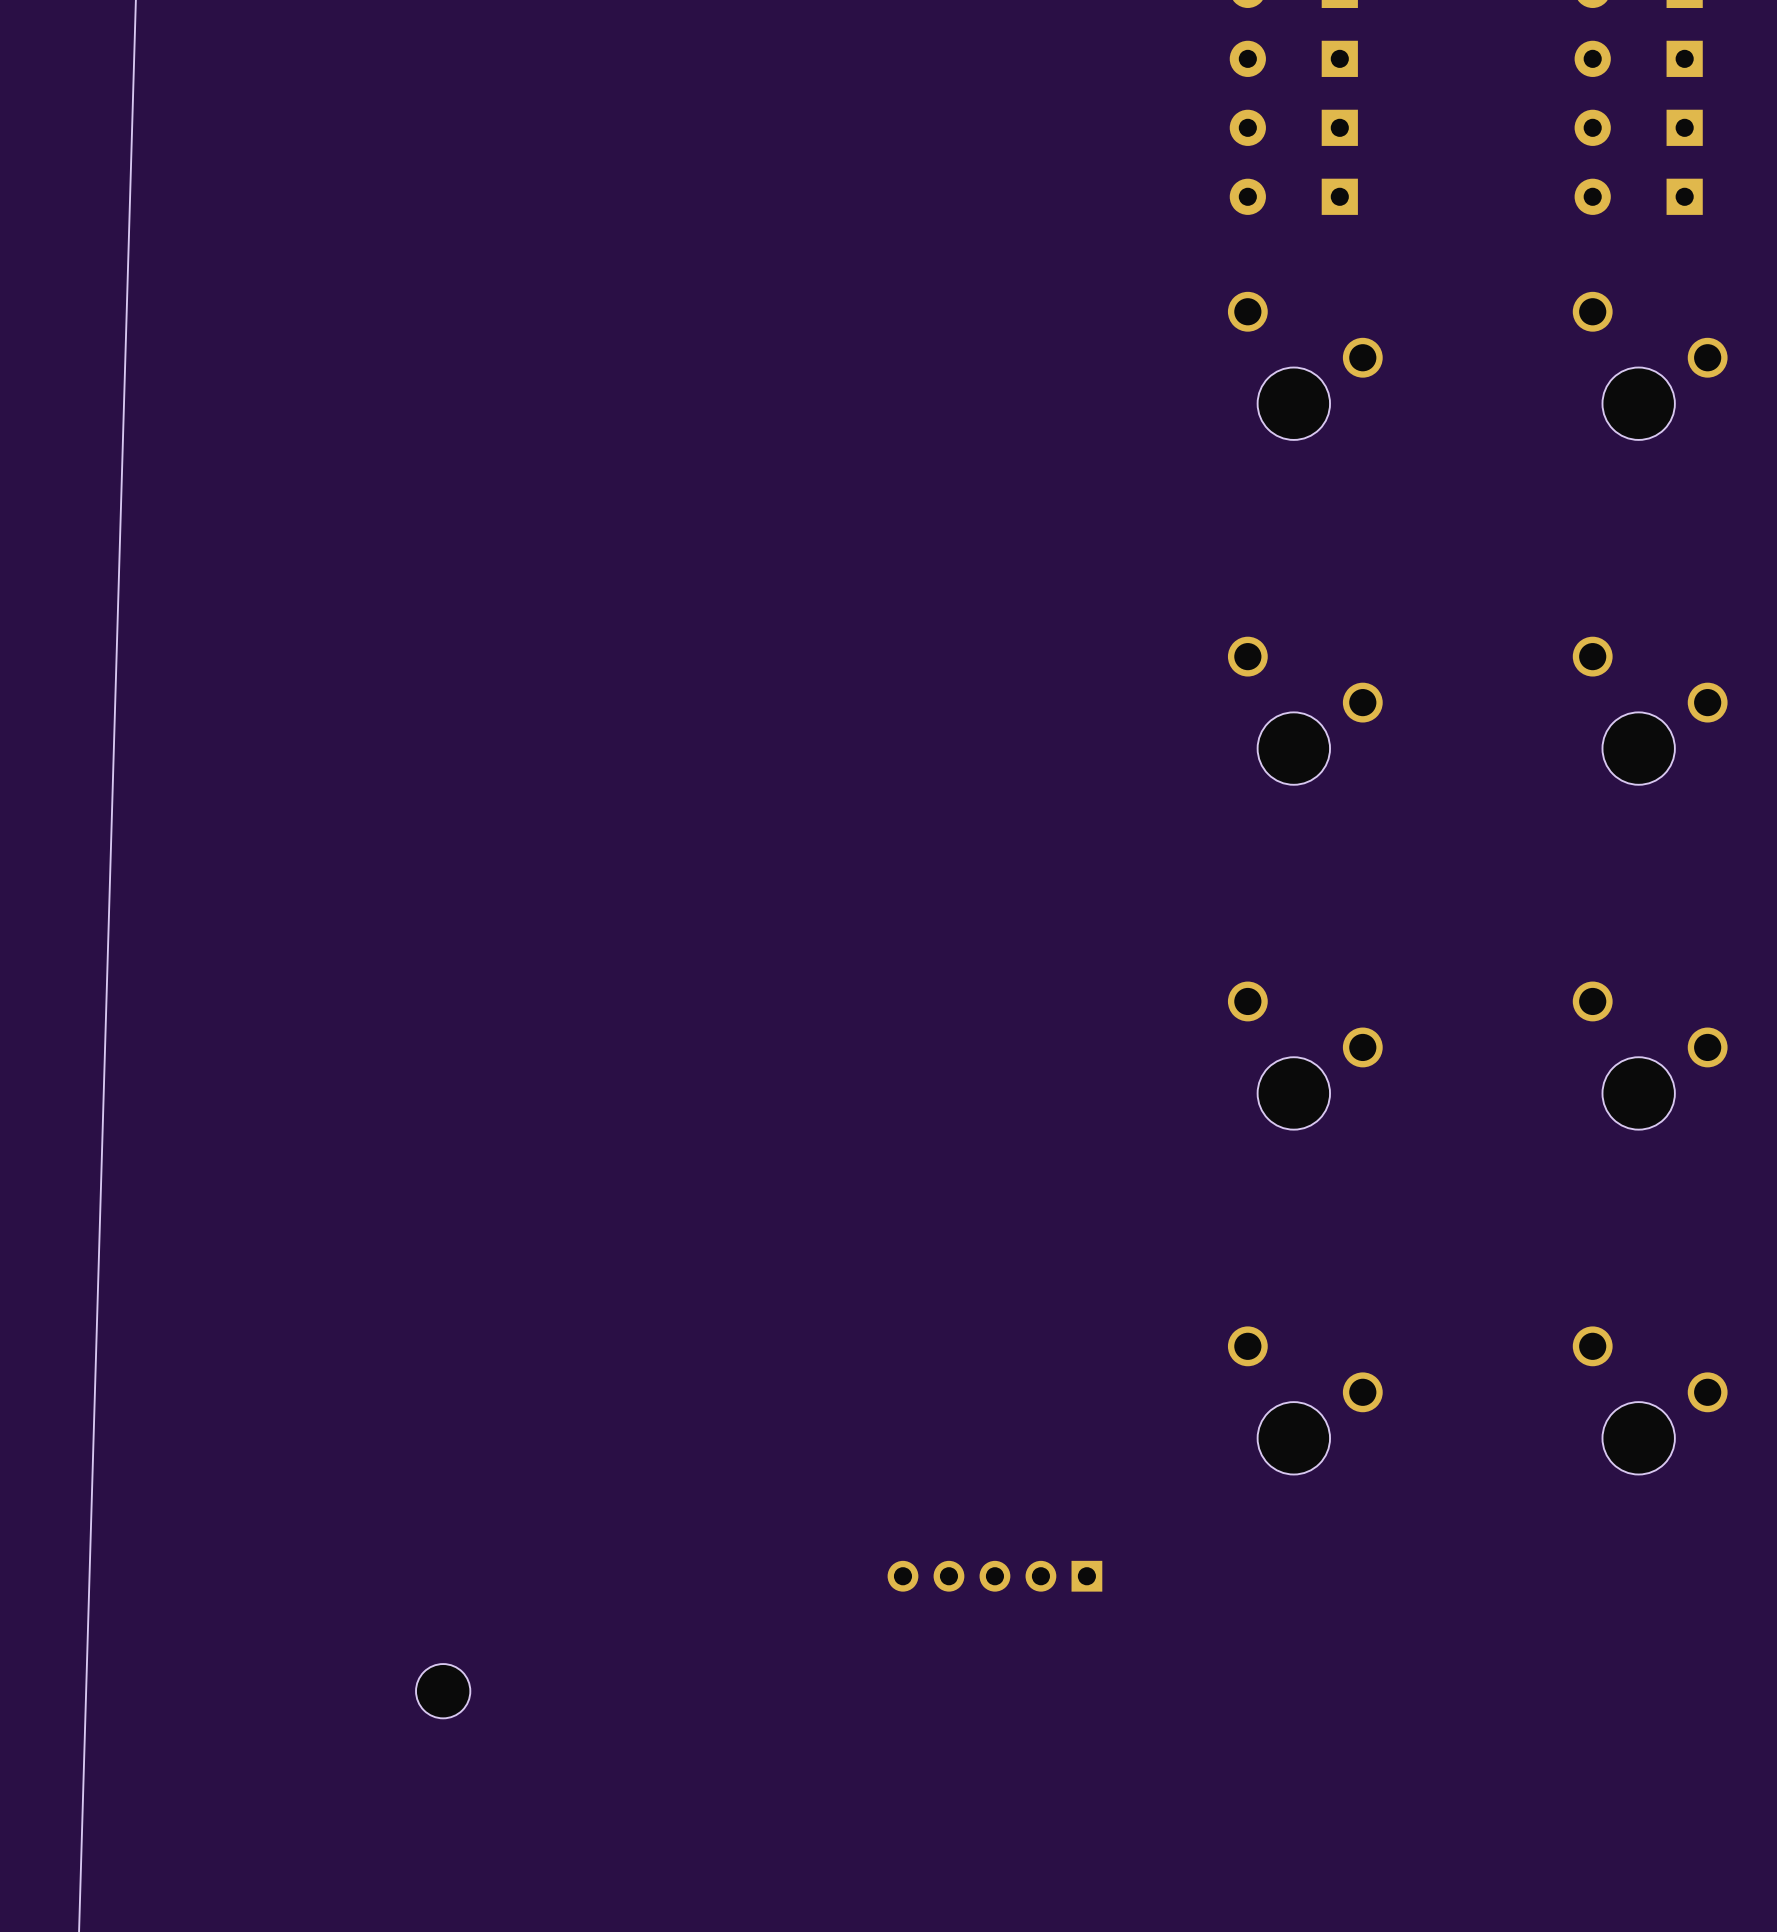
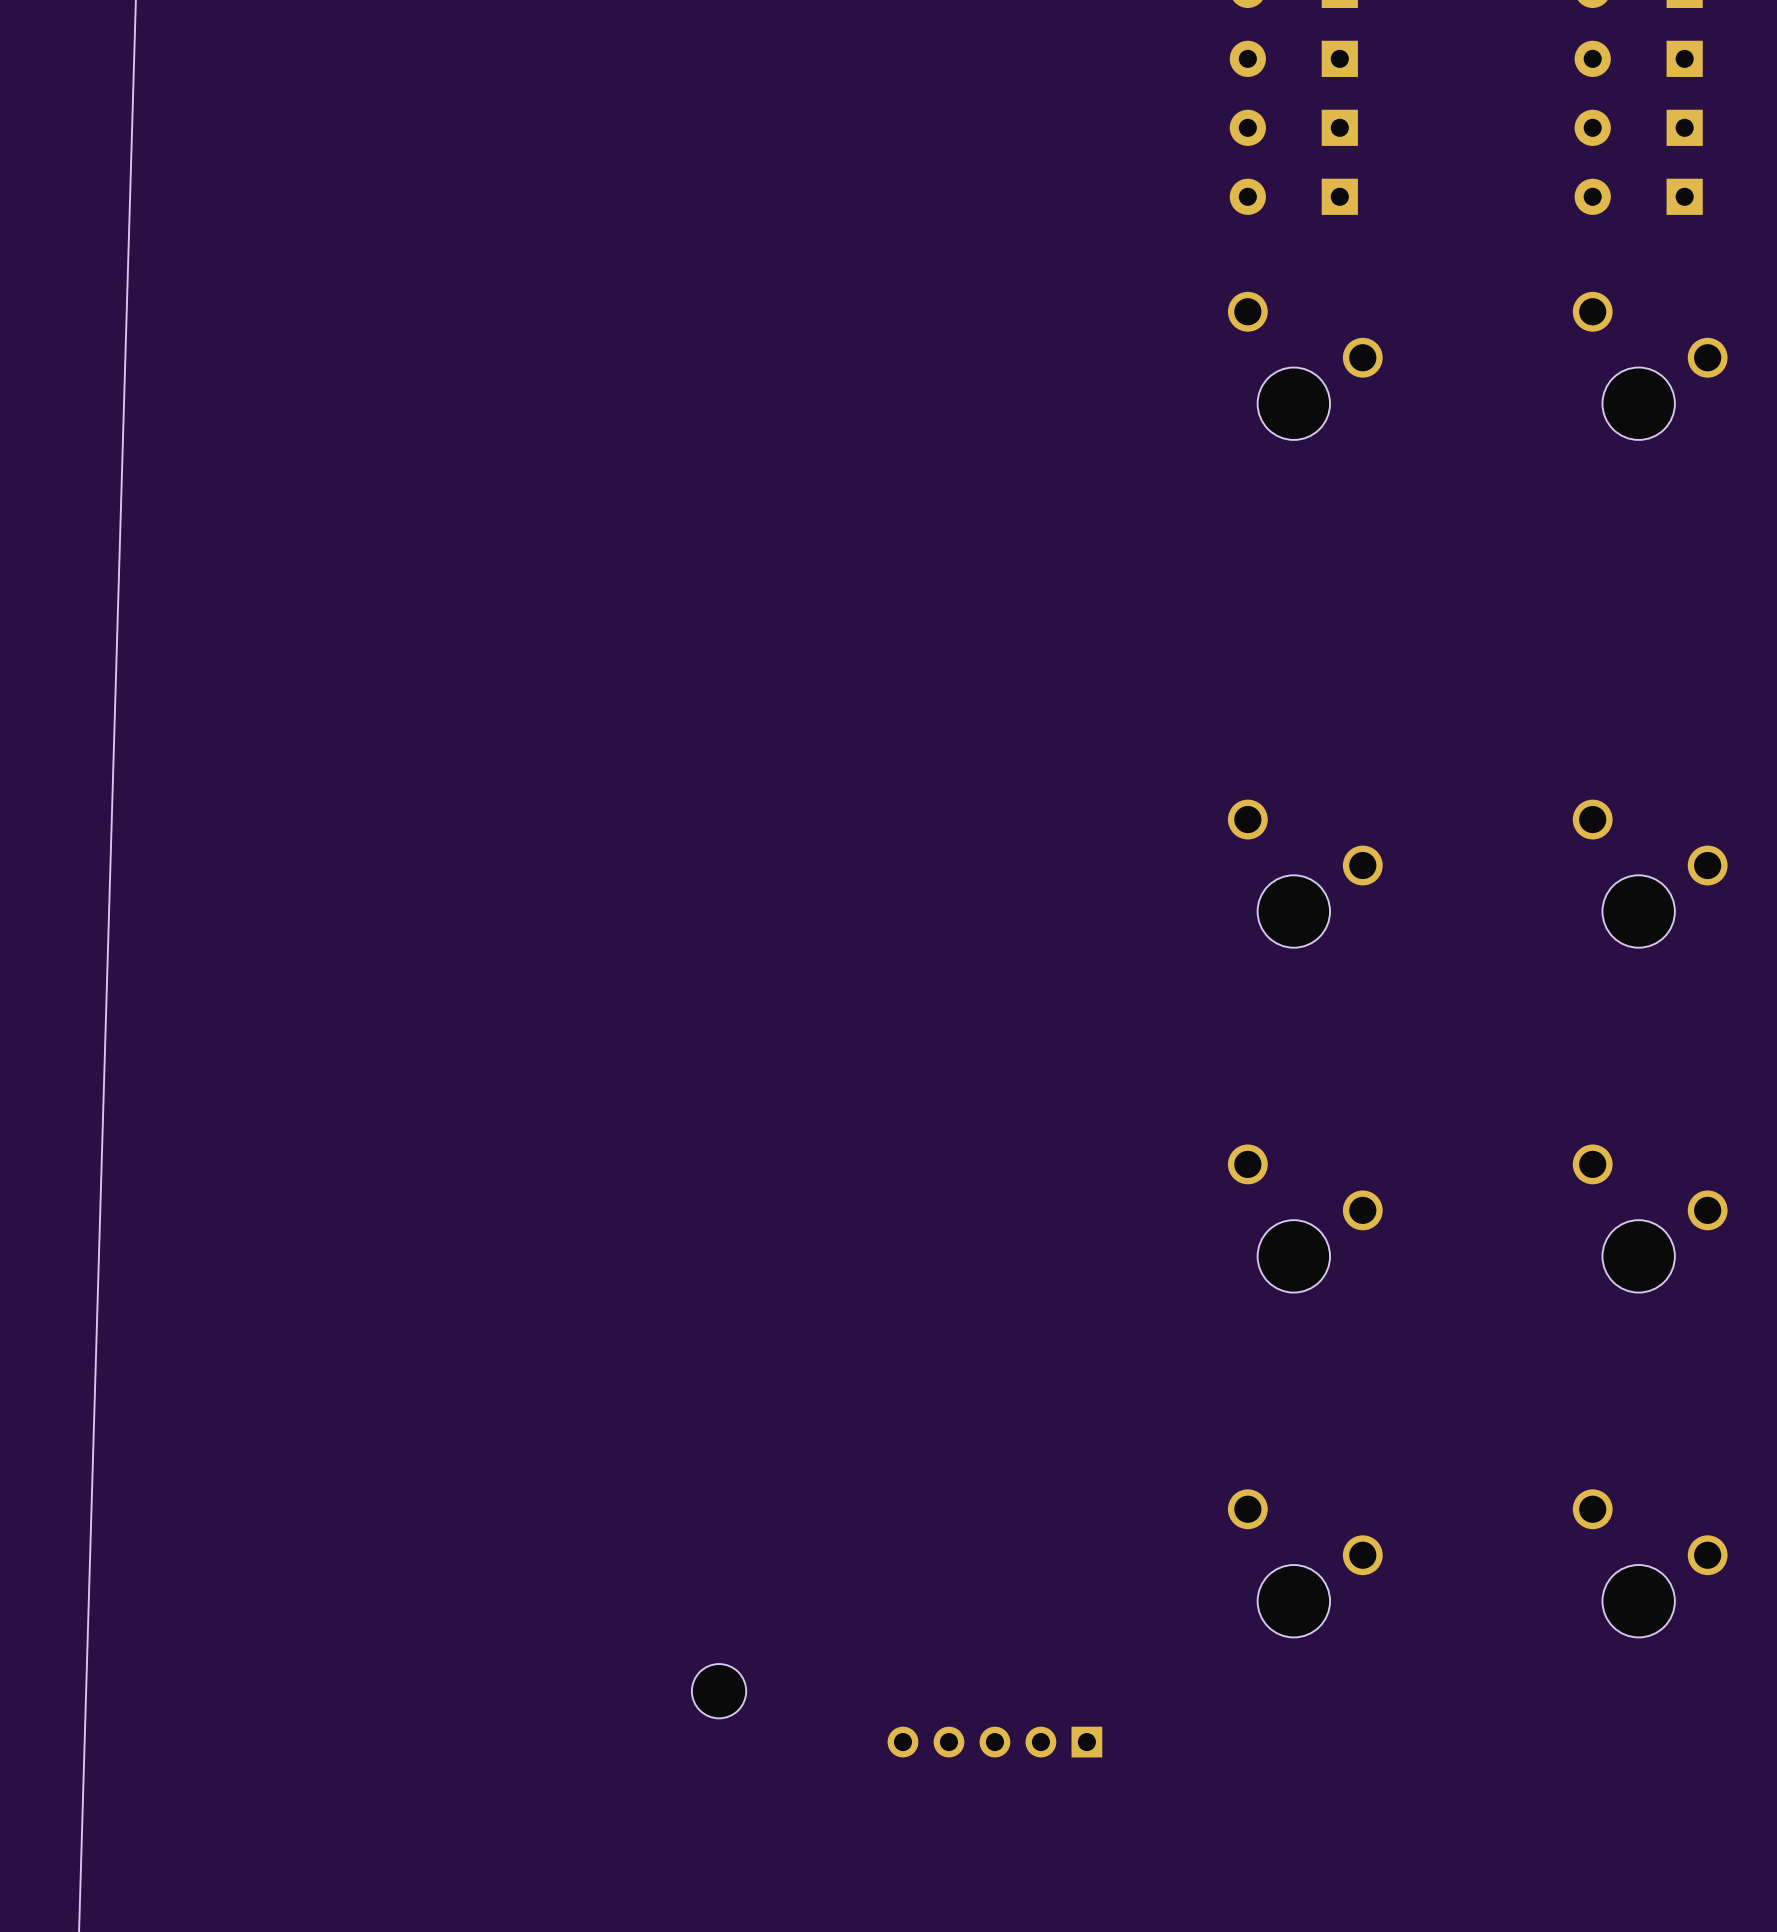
part: (1305, 710) -> none
part: (1650, 710) -> none
part: none -> (1305, 873)
part: none -> (1650, 873)
part: (1305, 1055) -> none
part: (1650, 1055) -> none
part: none -> (1305, 1218)
part: none -> (1650, 1218)
part: (1305, 1400) -> none
part: (1650, 1400) -> none
part: none -> (1305, 1563)
part: none -> (1650, 1563)
part position: (994, 1576) -> (994, 1742)
part position: (443, 1691) -> (719, 1691)

